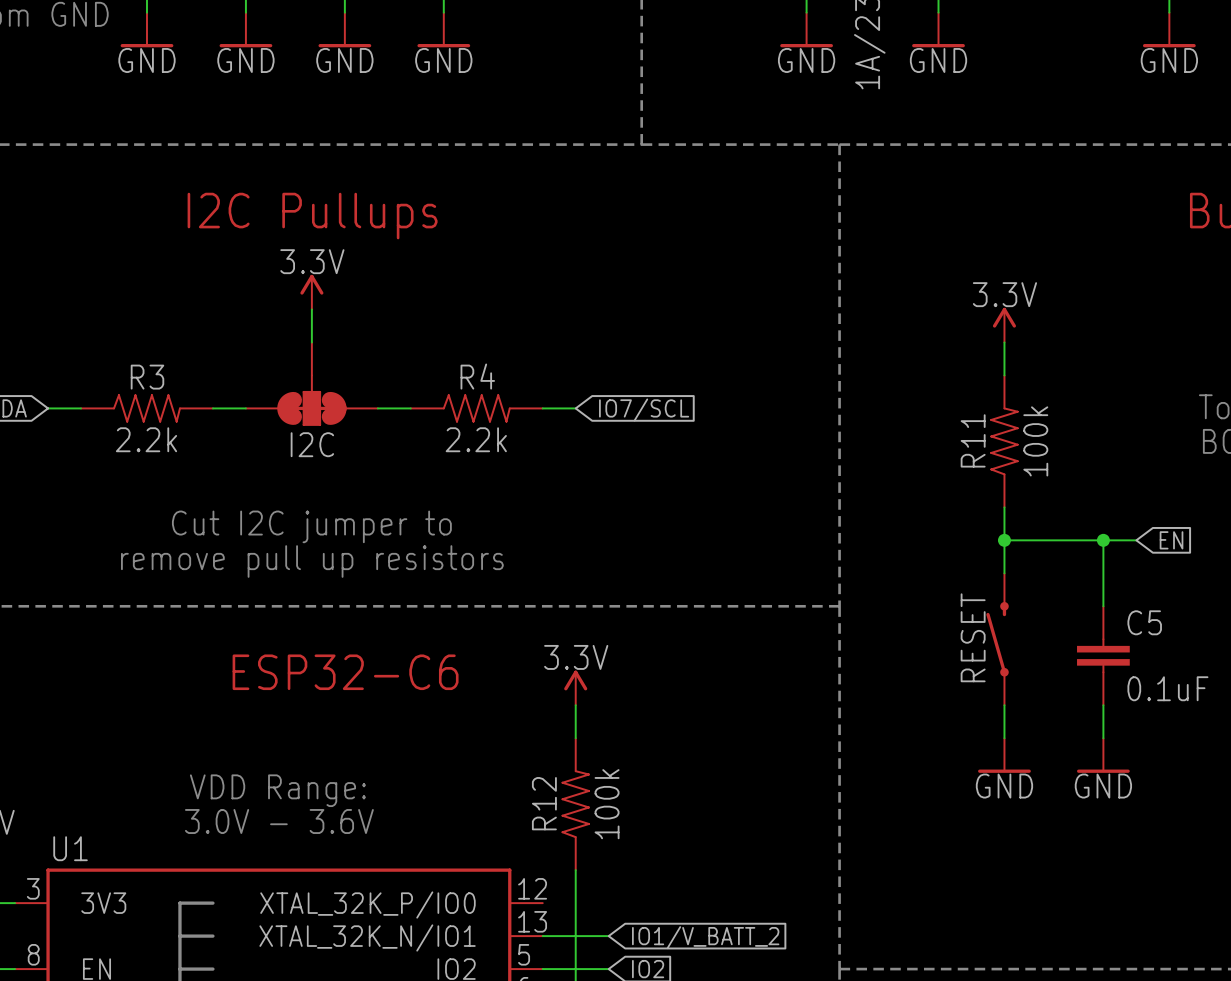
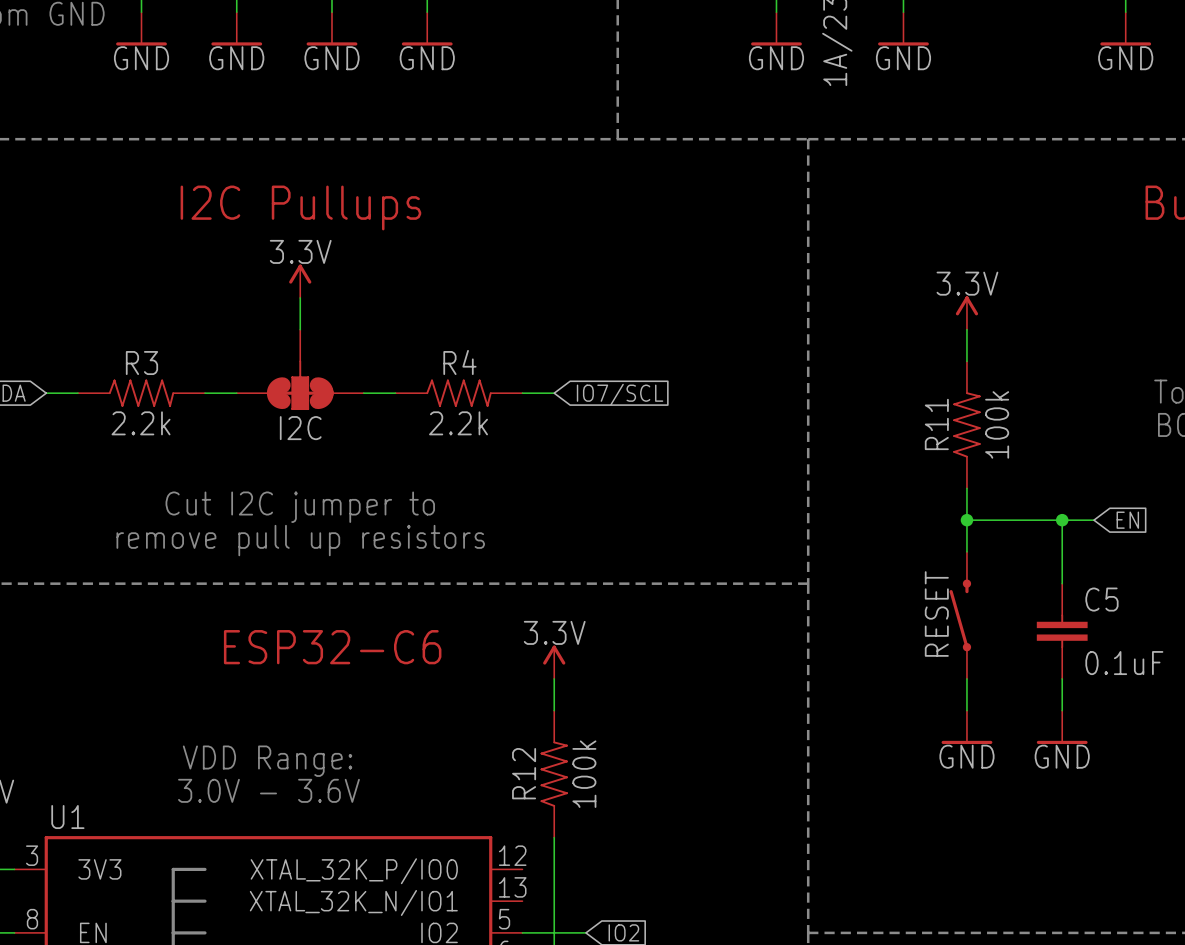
wire: (542, 936) (608, 936) -> none
global label: IO1/V_BATT_2 (705, 937) -> none

